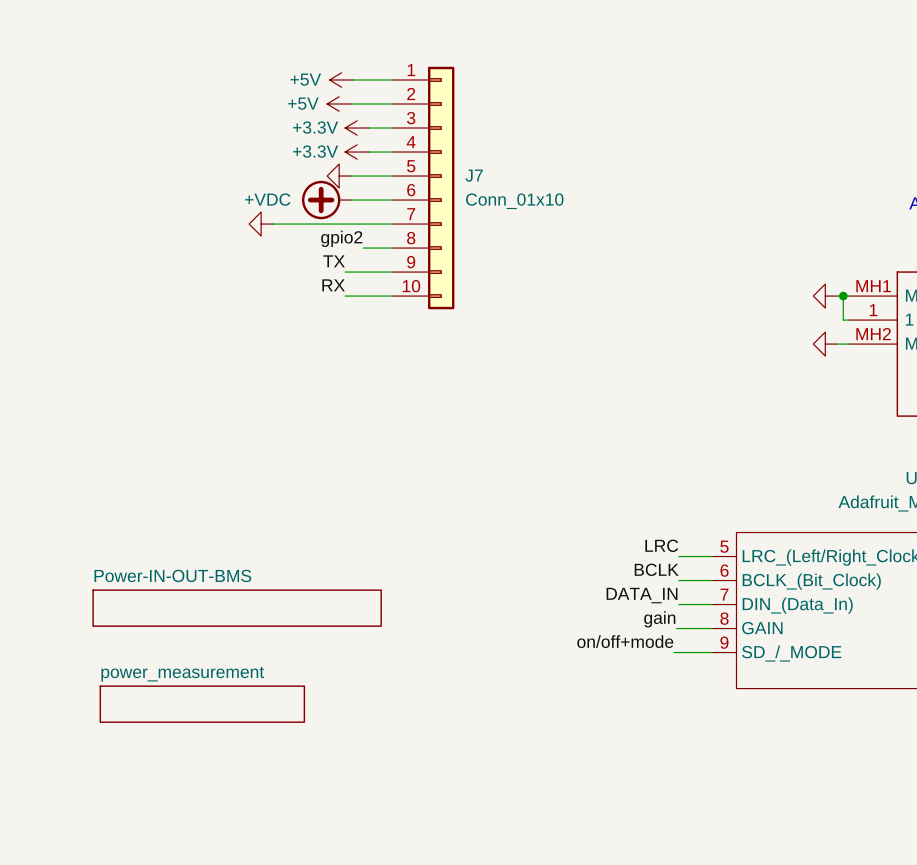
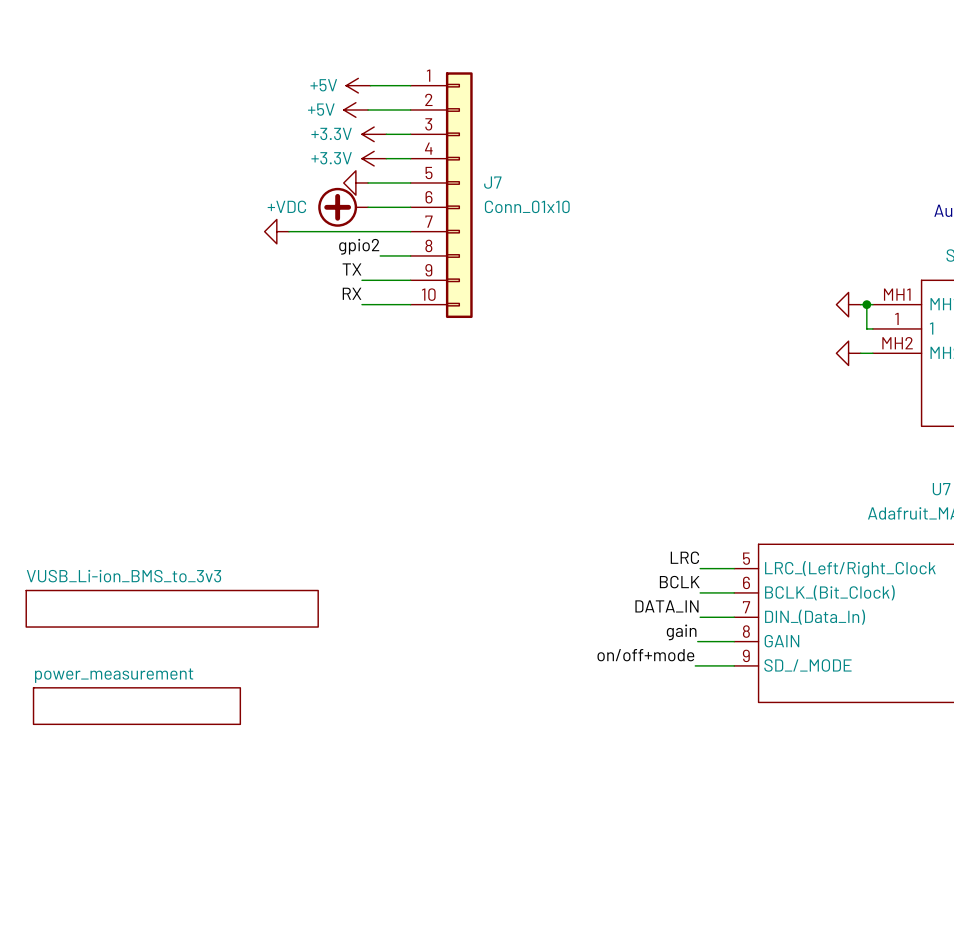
sheet VUSB_Li-ion_BMS_to_3v3: none -> (172, 608)
sheet Power-IN-OUT-BMS: (237, 608) -> none
sheet power_measurement position: (202, 704) -> (136, 706)

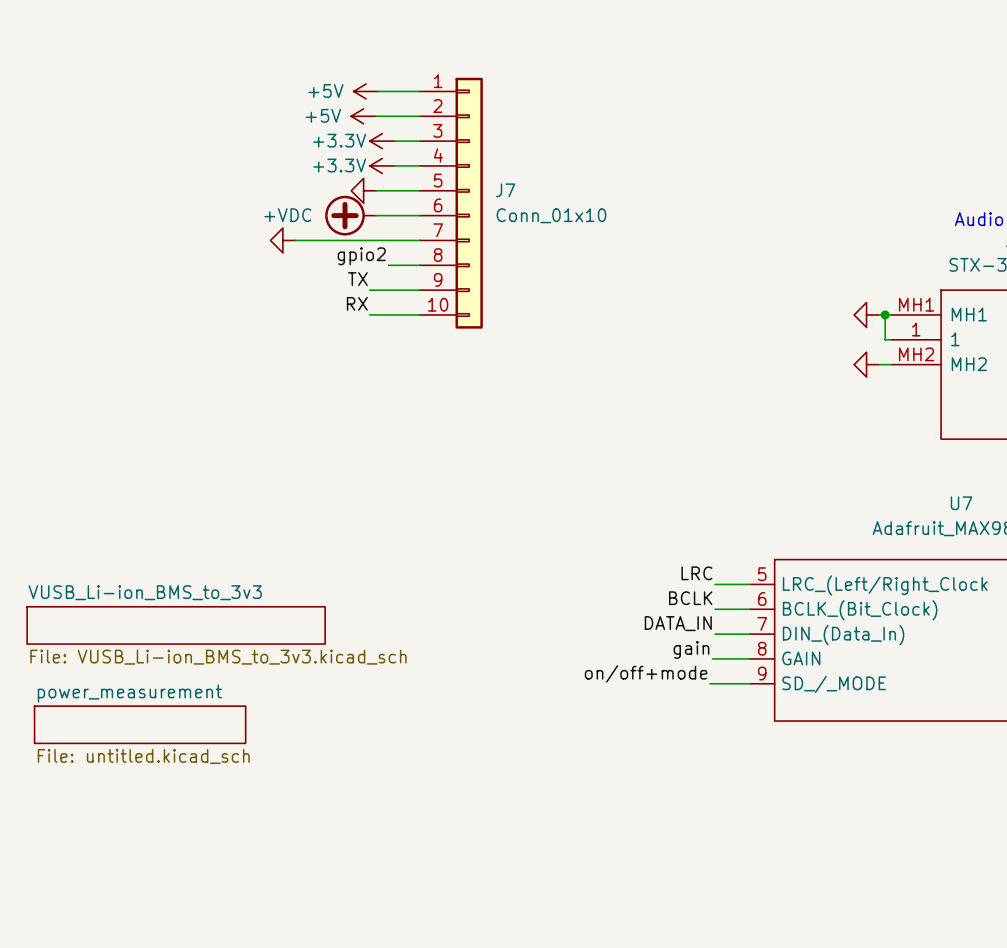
sheet VUSB_Li-ion_BMS_to_3v3 value: none -> File: VUSB_Li-ion_BMS_to_3v3.kicad_sch (218, 657)
sheet power_measurement value: none -> File: untitled.kicad_sch (143, 756)

